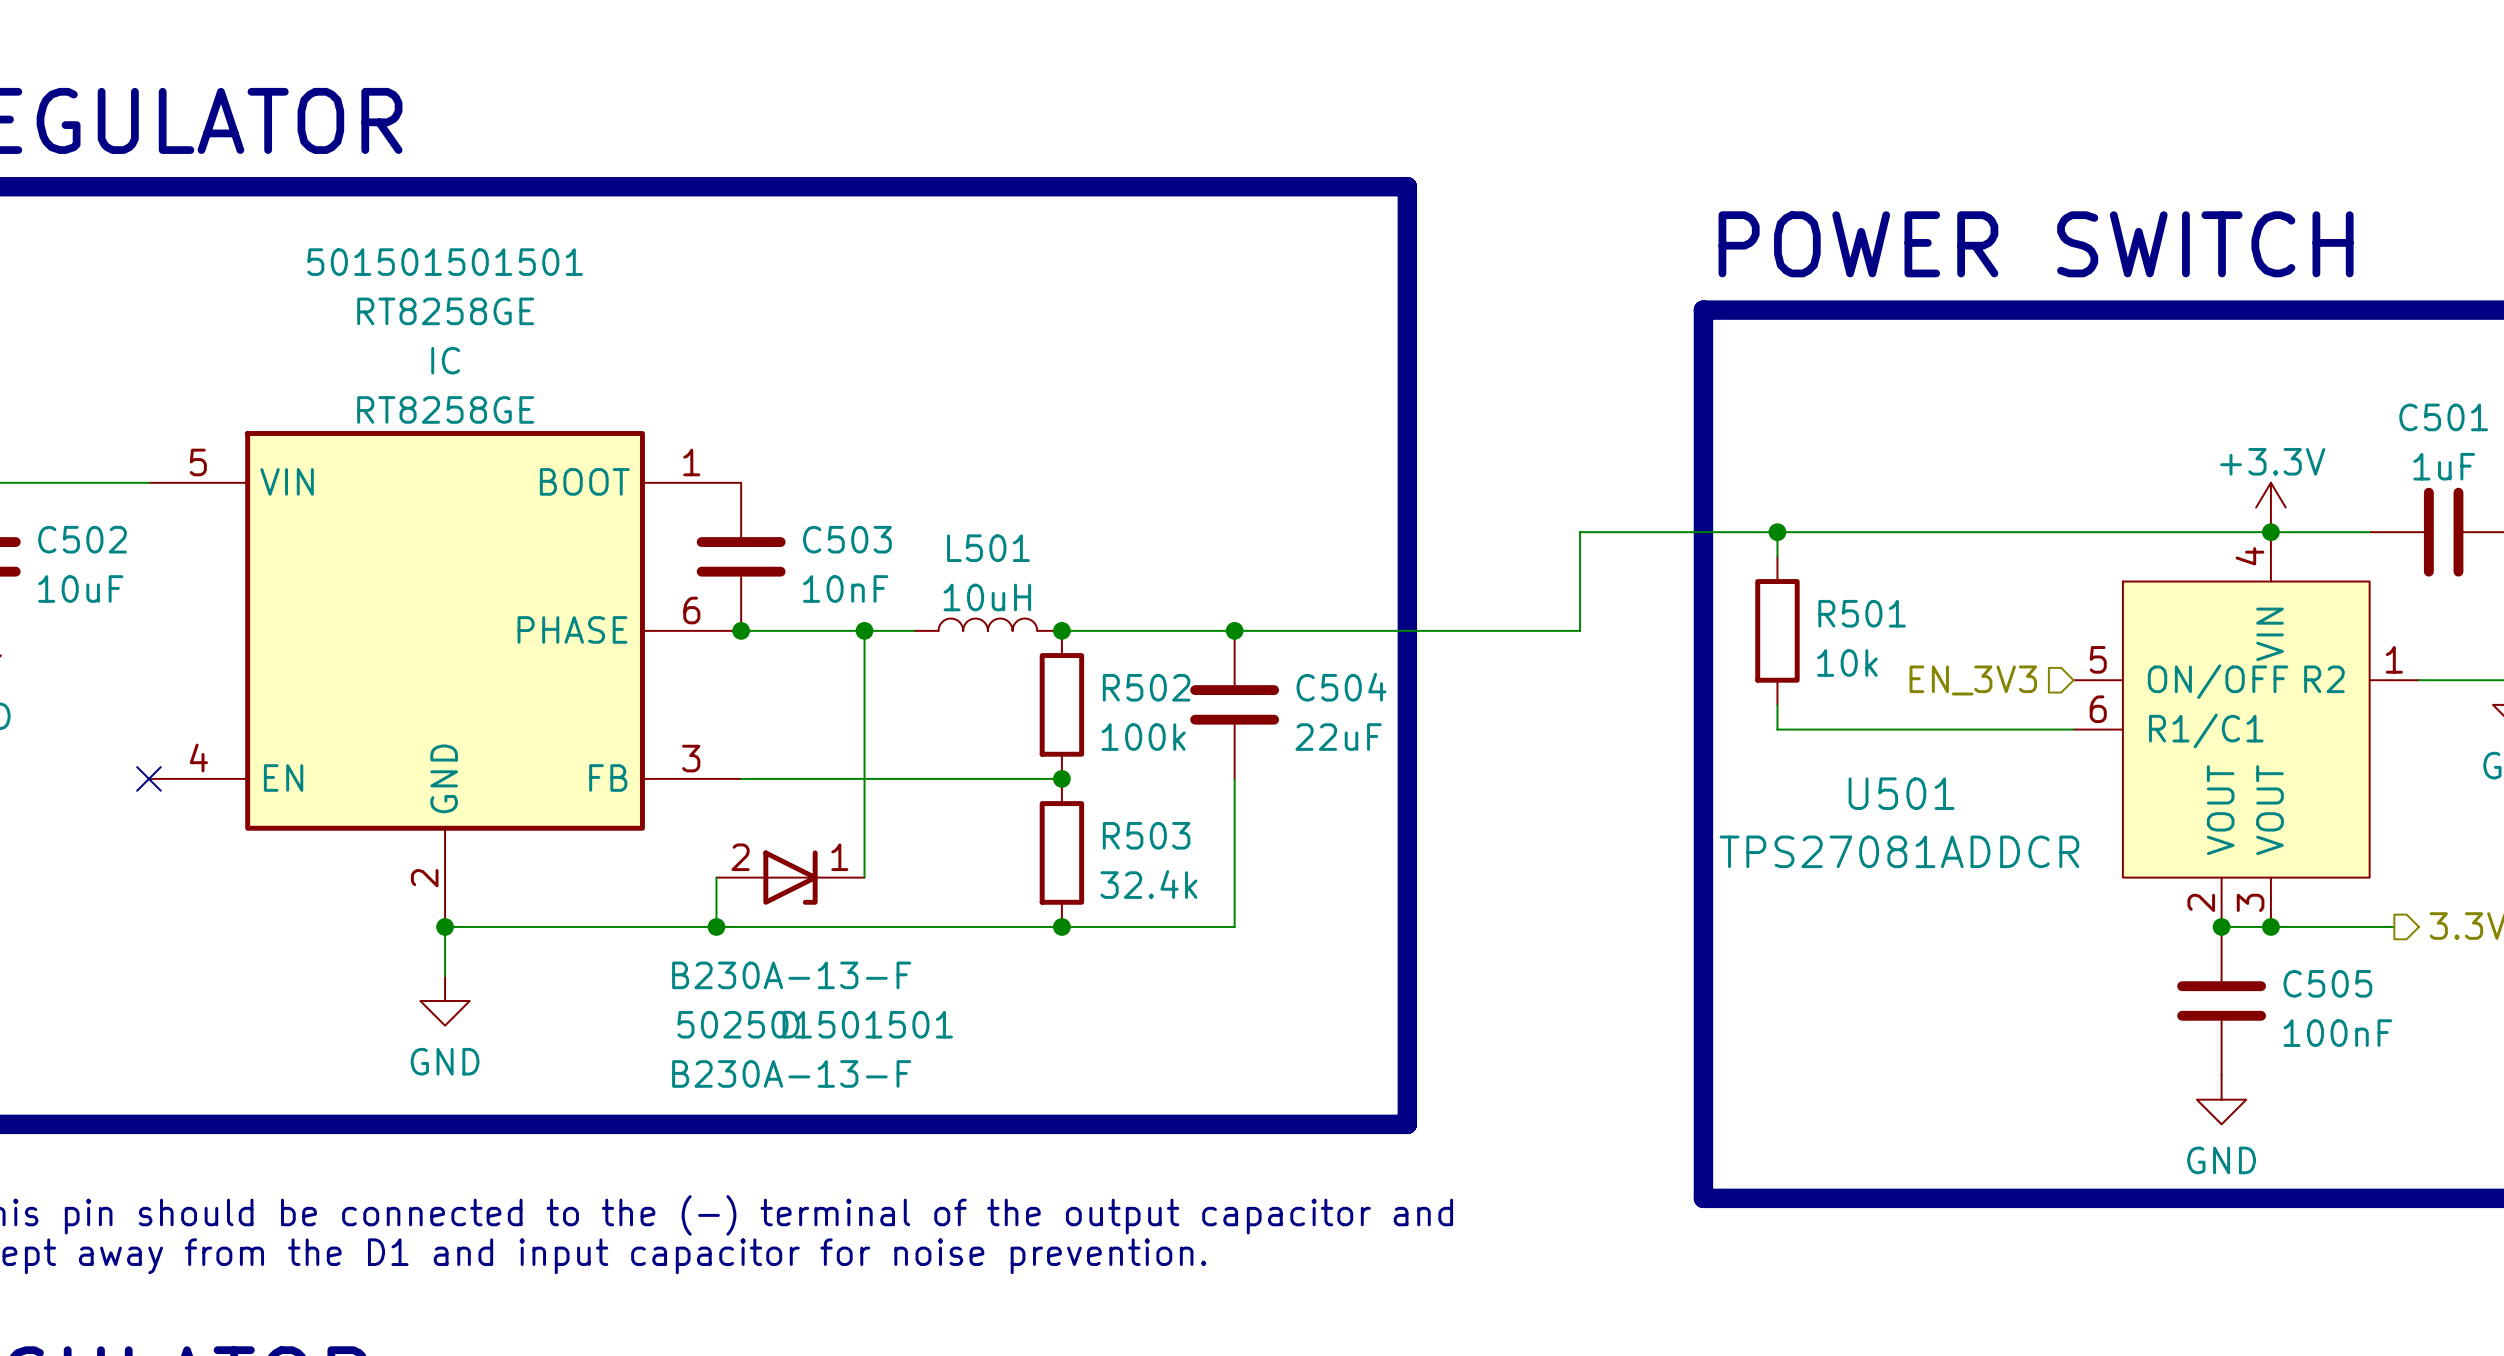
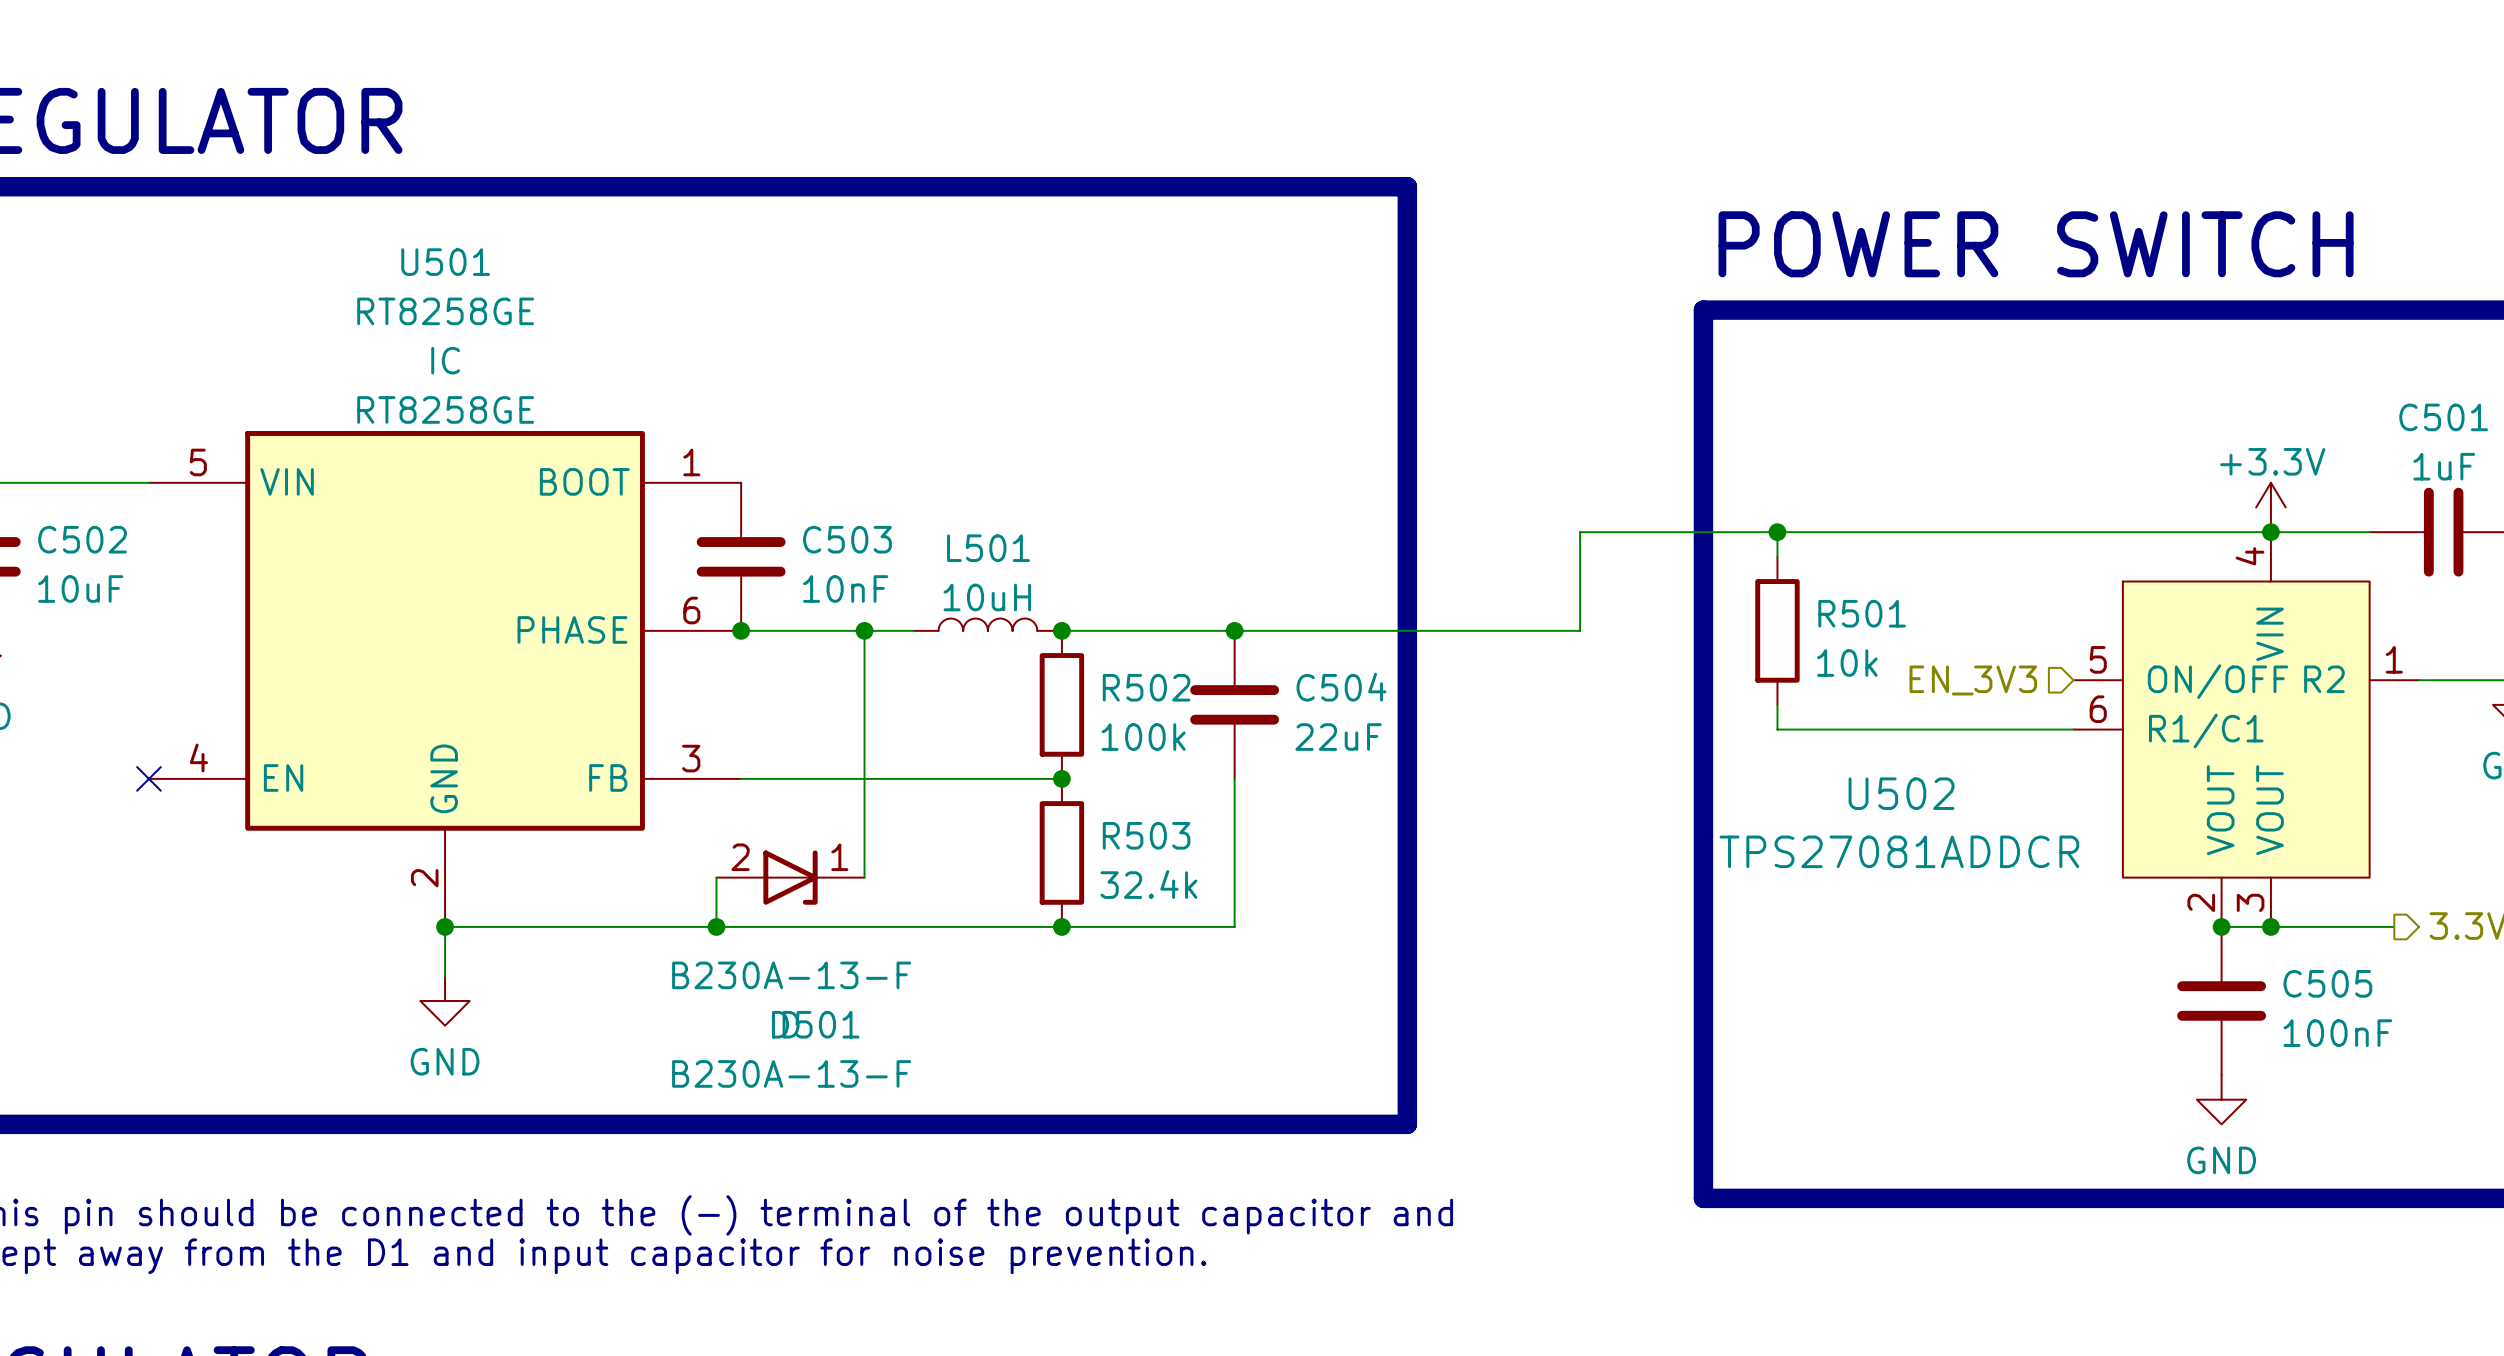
501501501501 name: 501501501501 (445, 262) -> U501 (445, 262)
U501 name: U501 (1901, 793) -> U502 (1901, 793)
502501501501 name: 502501501501 (815, 1024) -> D501 (815, 1024)

